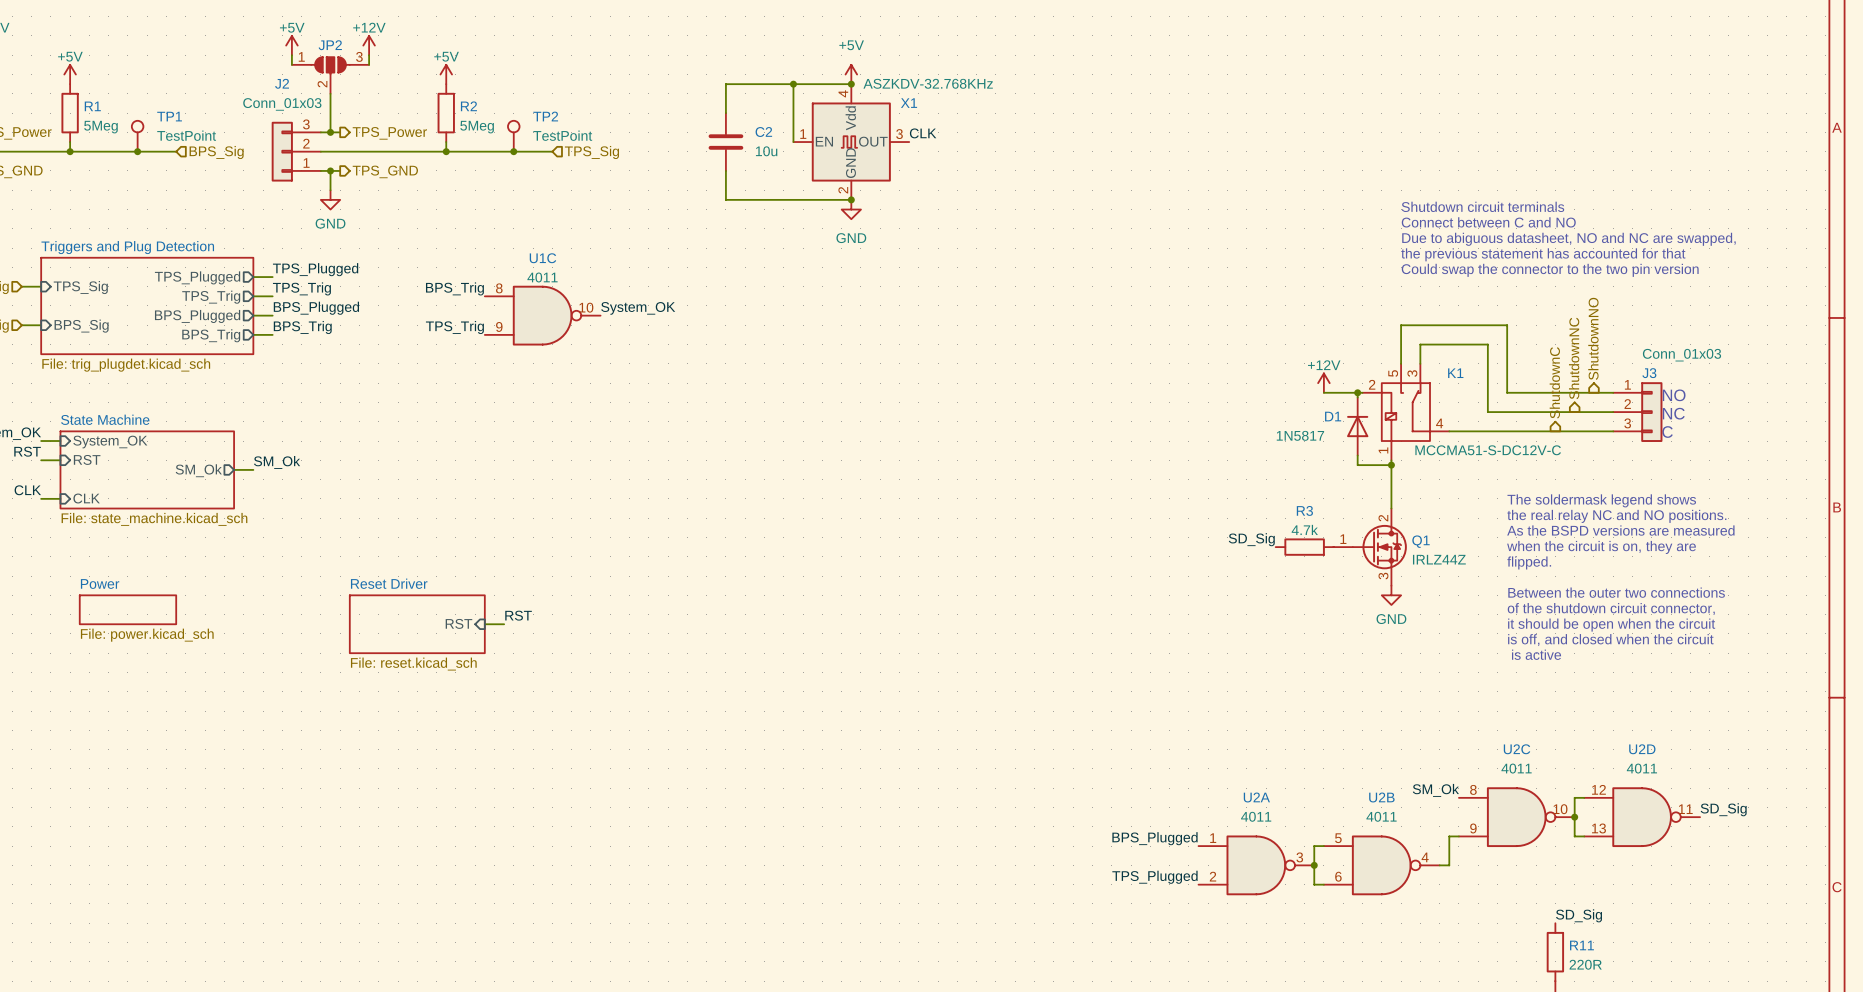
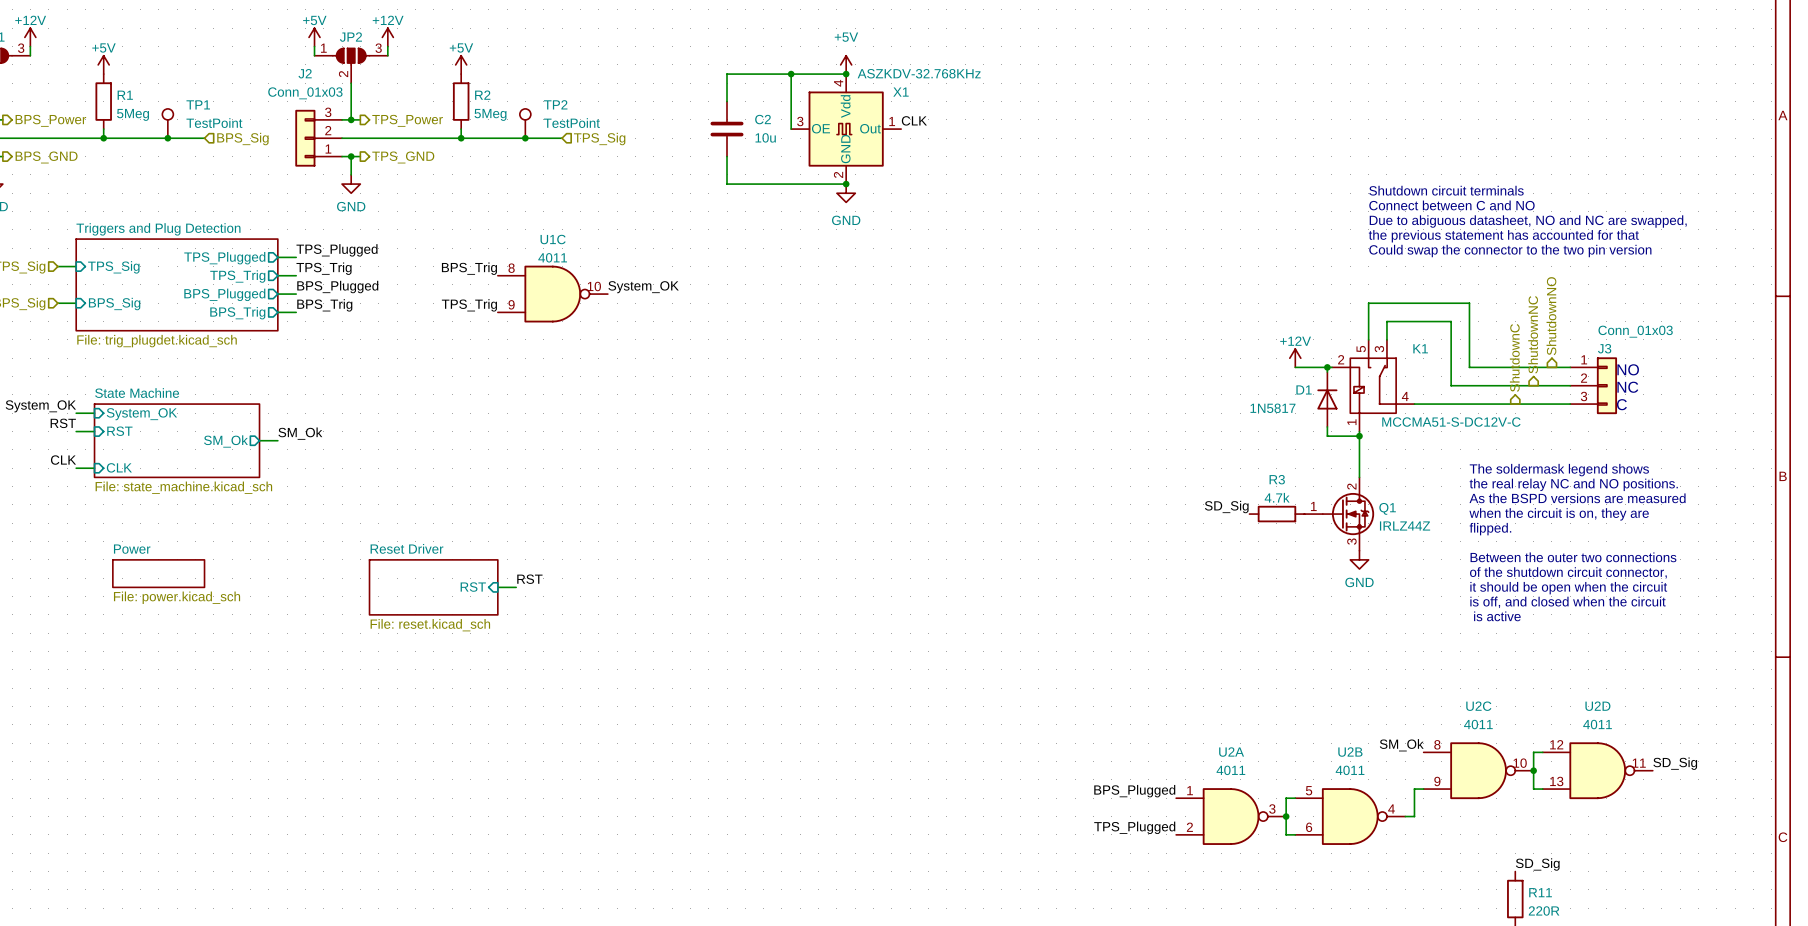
X1 pin number: 1 (803, 134) -> 3 (800, 121)
X1 pin number: 3 (899, 134) -> 1 (892, 121)
X1 pin name: EN (824, 141) -> OE (820, 128)
X1 pin name: OUT (873, 141) -> Out (870, 128)

